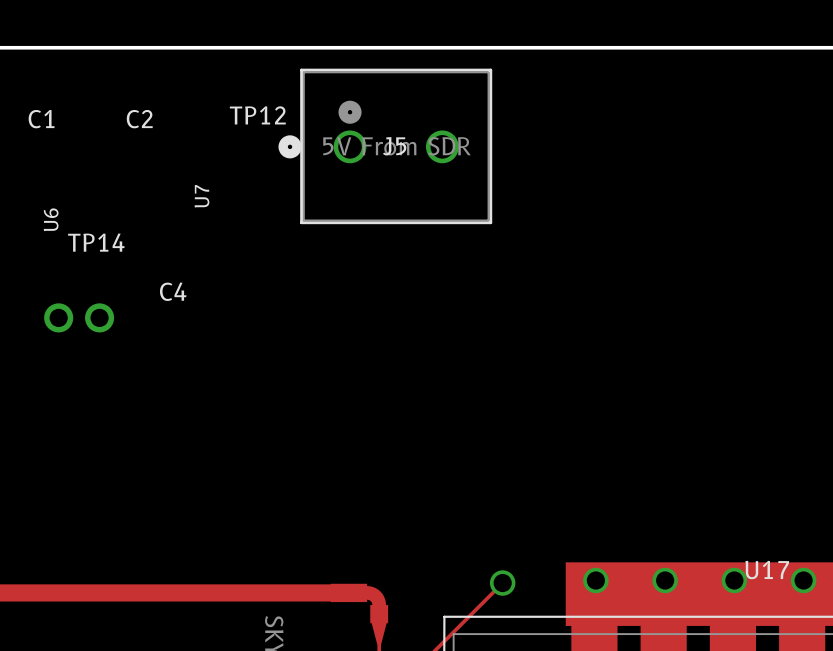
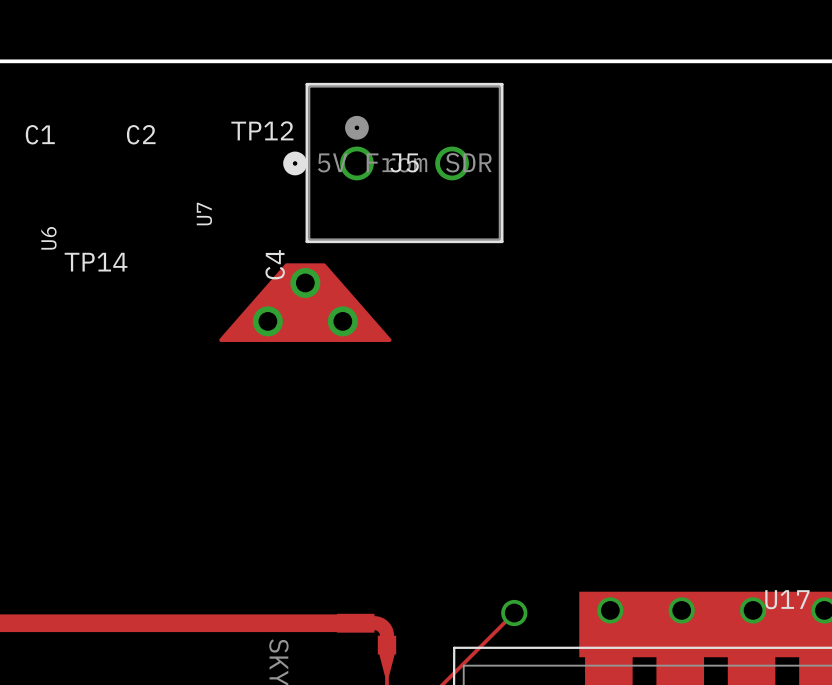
drawing: none -> [219, 263, 392, 342]
via: none -> (305, 282)
C4 position: (173, 291) -> (275, 264)
C4 name rotation: 0° (173, 291) -> 90° counterclockwise (275, 264)
via: none -> (267, 321)
via: none -> (342, 321)
via: (58, 317) -> none
via: (99, 317) -> none

